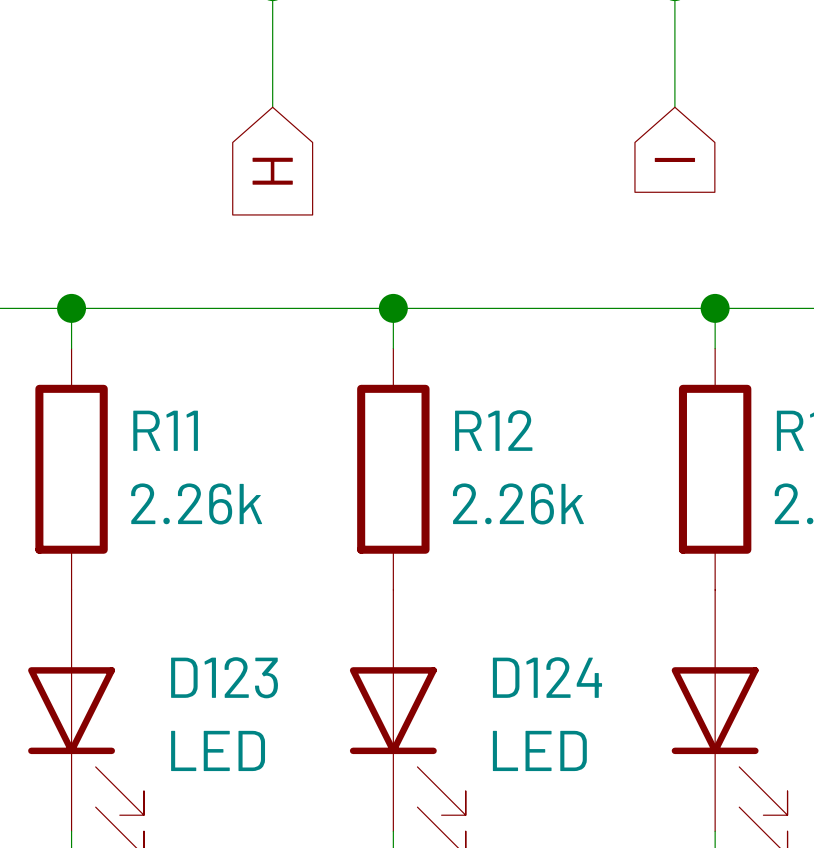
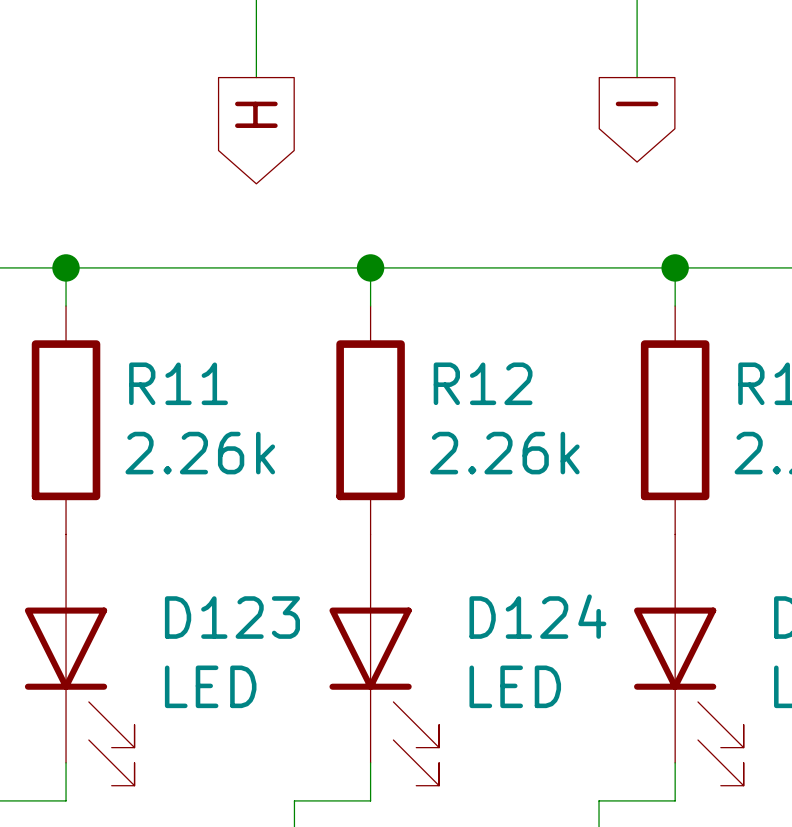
global label shape: input (674, 159) -> output (637, 103)
global label shape: input (272, 171) -> output (256, 114)

